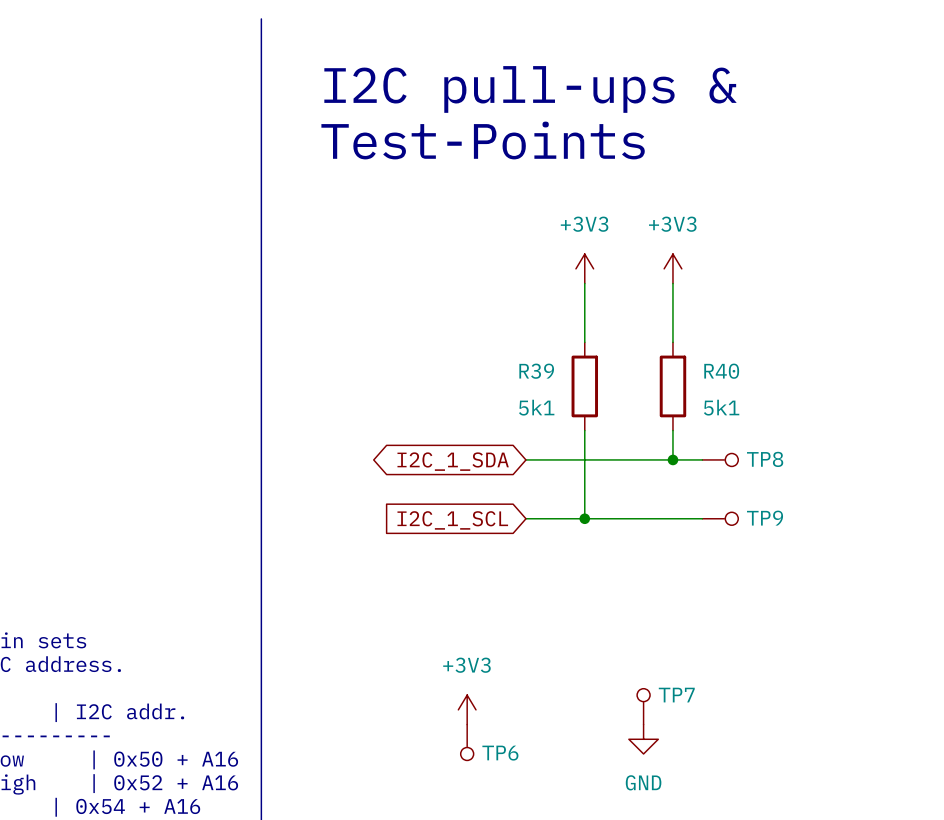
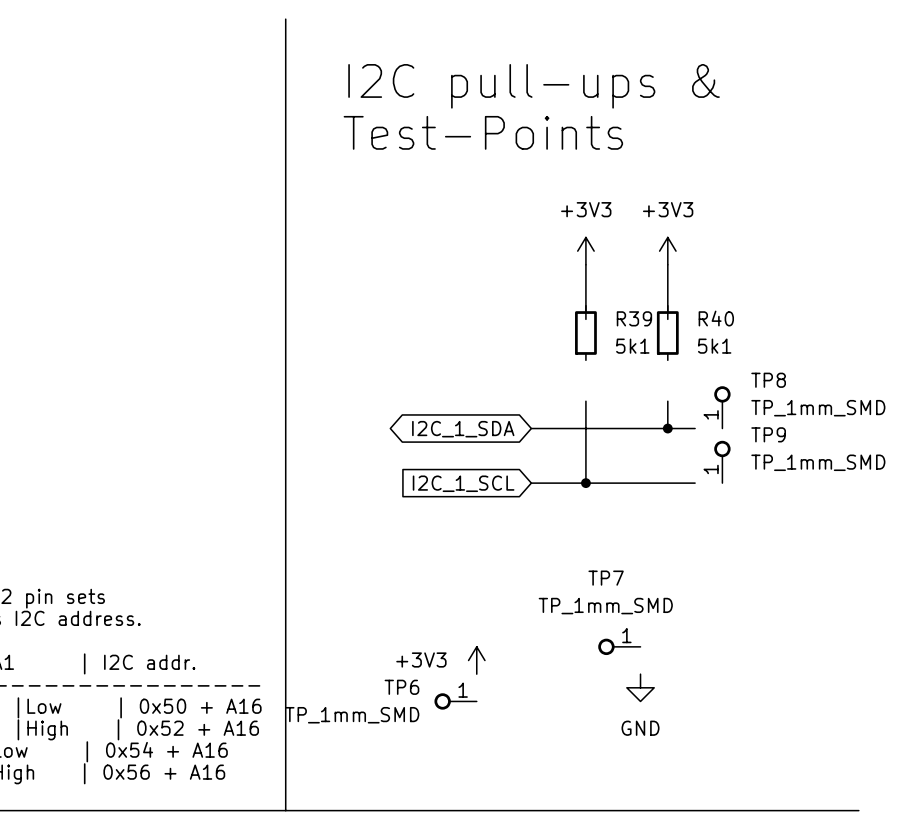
R39 symbol: [571, 342, 599, 431] -> [575, 305, 597, 361]
R40 symbol: [659, 342, 687, 431] -> [656, 305, 679, 361]
R39 name position: R39 (536, 371) -> R39 (634, 318)
R39 text position: 5k1 (536, 407) -> 5k1 (632, 346)
TP8 value: none -> TP_1mm_SMD (818, 408)
TP8 symbol: [702, 453, 739, 467] -> [714, 386, 731, 429]
TP8 name position: TP8 (765, 459) -> TP8 (768, 380)
TP9 value: none -> TP_1mm_SMD (818, 462)
TP9 symbol: [702, 512, 739, 526] -> [714, 440, 731, 484]
TP9 name position: TP9 (765, 518) -> TP9 (768, 434)
TP7 value: none -> TP_1mm_SMD (605, 606)
power symbol text position: +3V3 (466, 665) -> +3V3 (421, 660)
TP7 symbol: [637, 688, 651, 725] -> [598, 638, 641, 656]
TP7 name position: TP7 (676, 695) -> TP7 (606, 578)
TP6 symbol: [460, 724, 474, 761] -> [434, 693, 477, 710]
TP6 name position: TP6 (500, 753) -> TP6 (401, 687)
TP6 value: none -> TP_1mm_SMD (352, 715)

